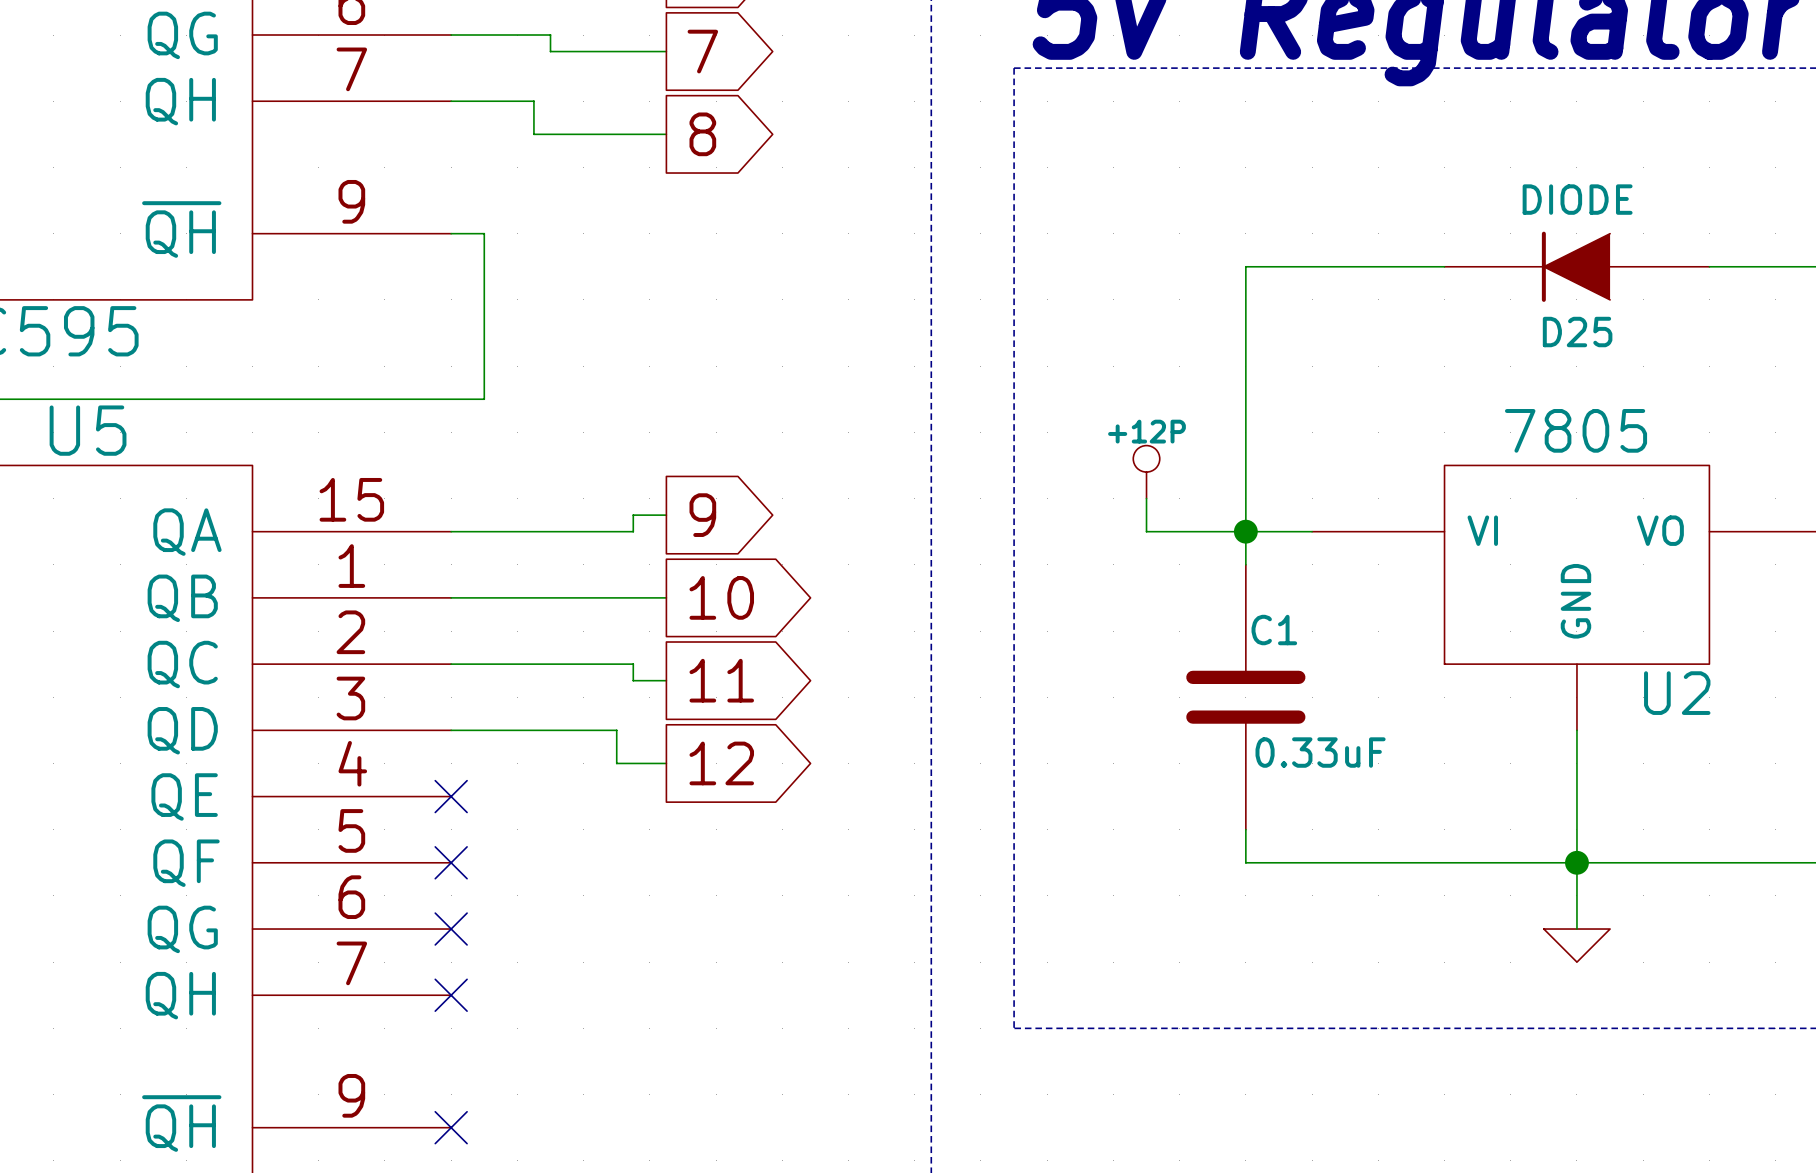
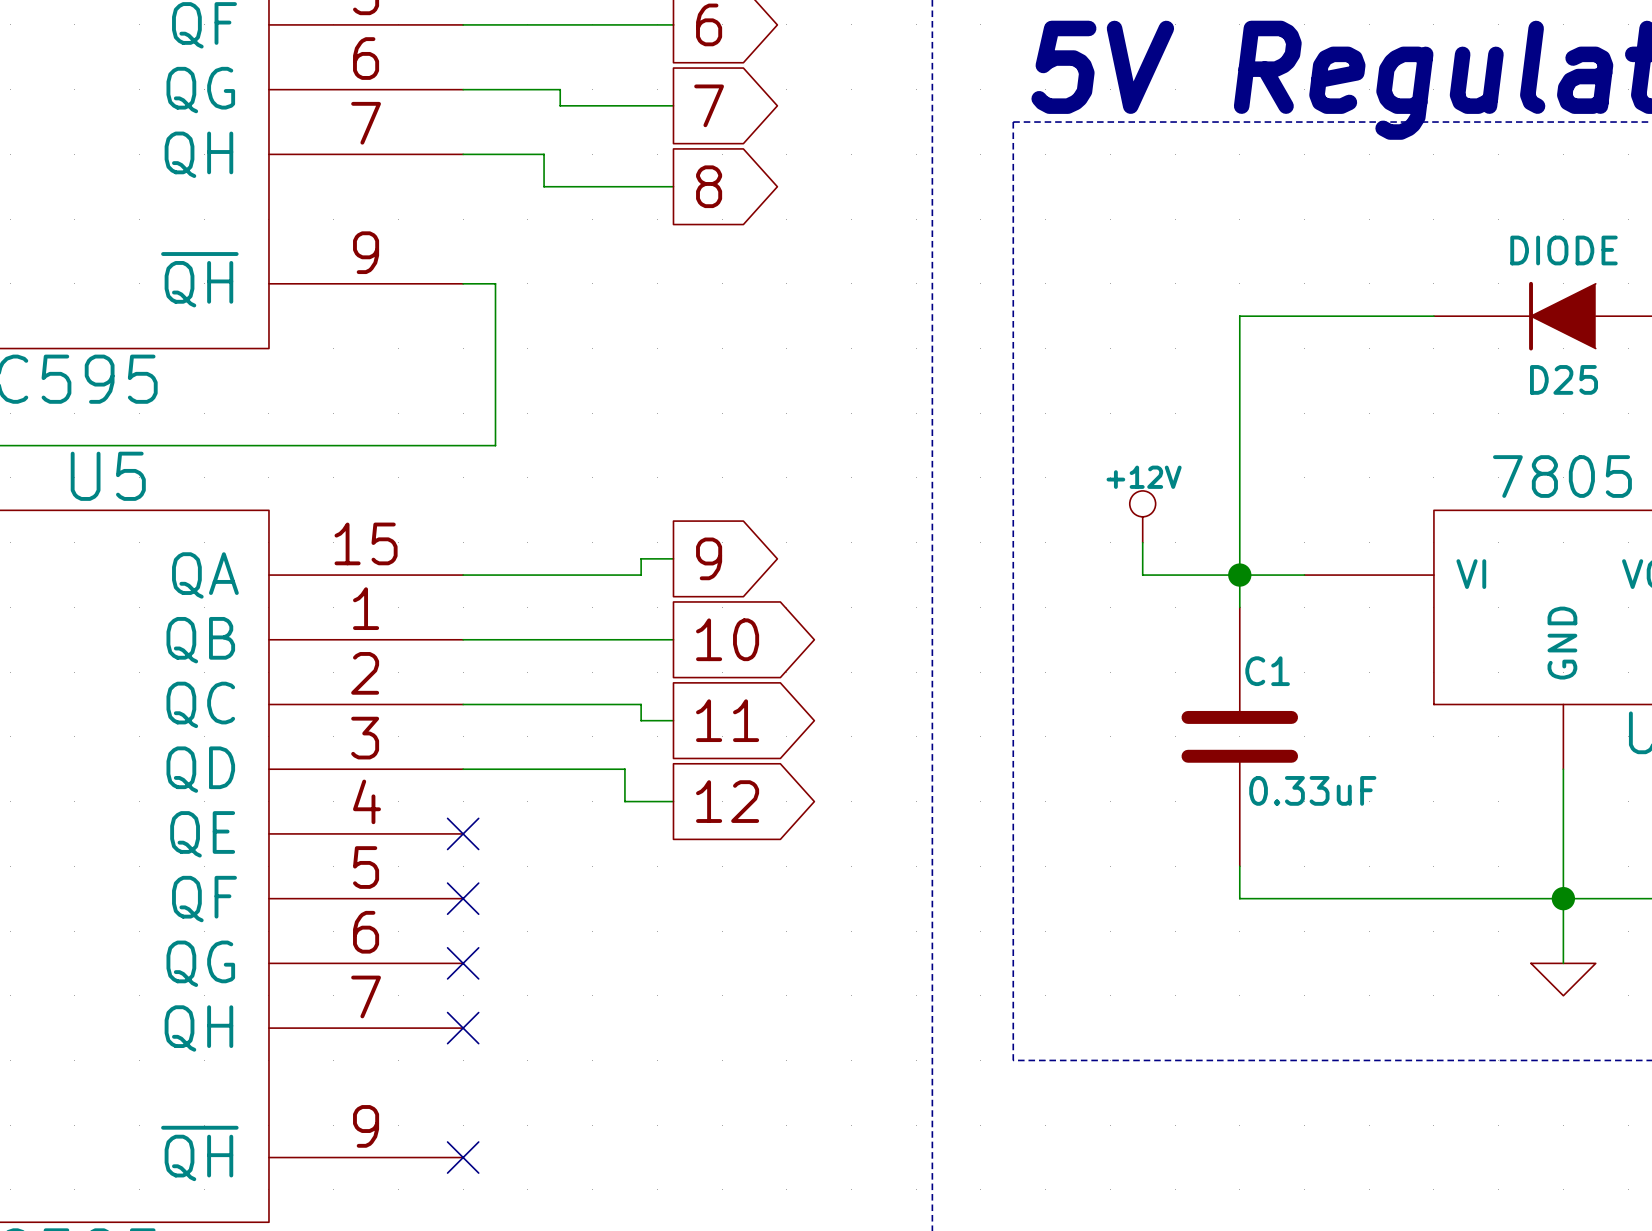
power symbol: +12P (1146, 472) -> +12V (1142, 516)

